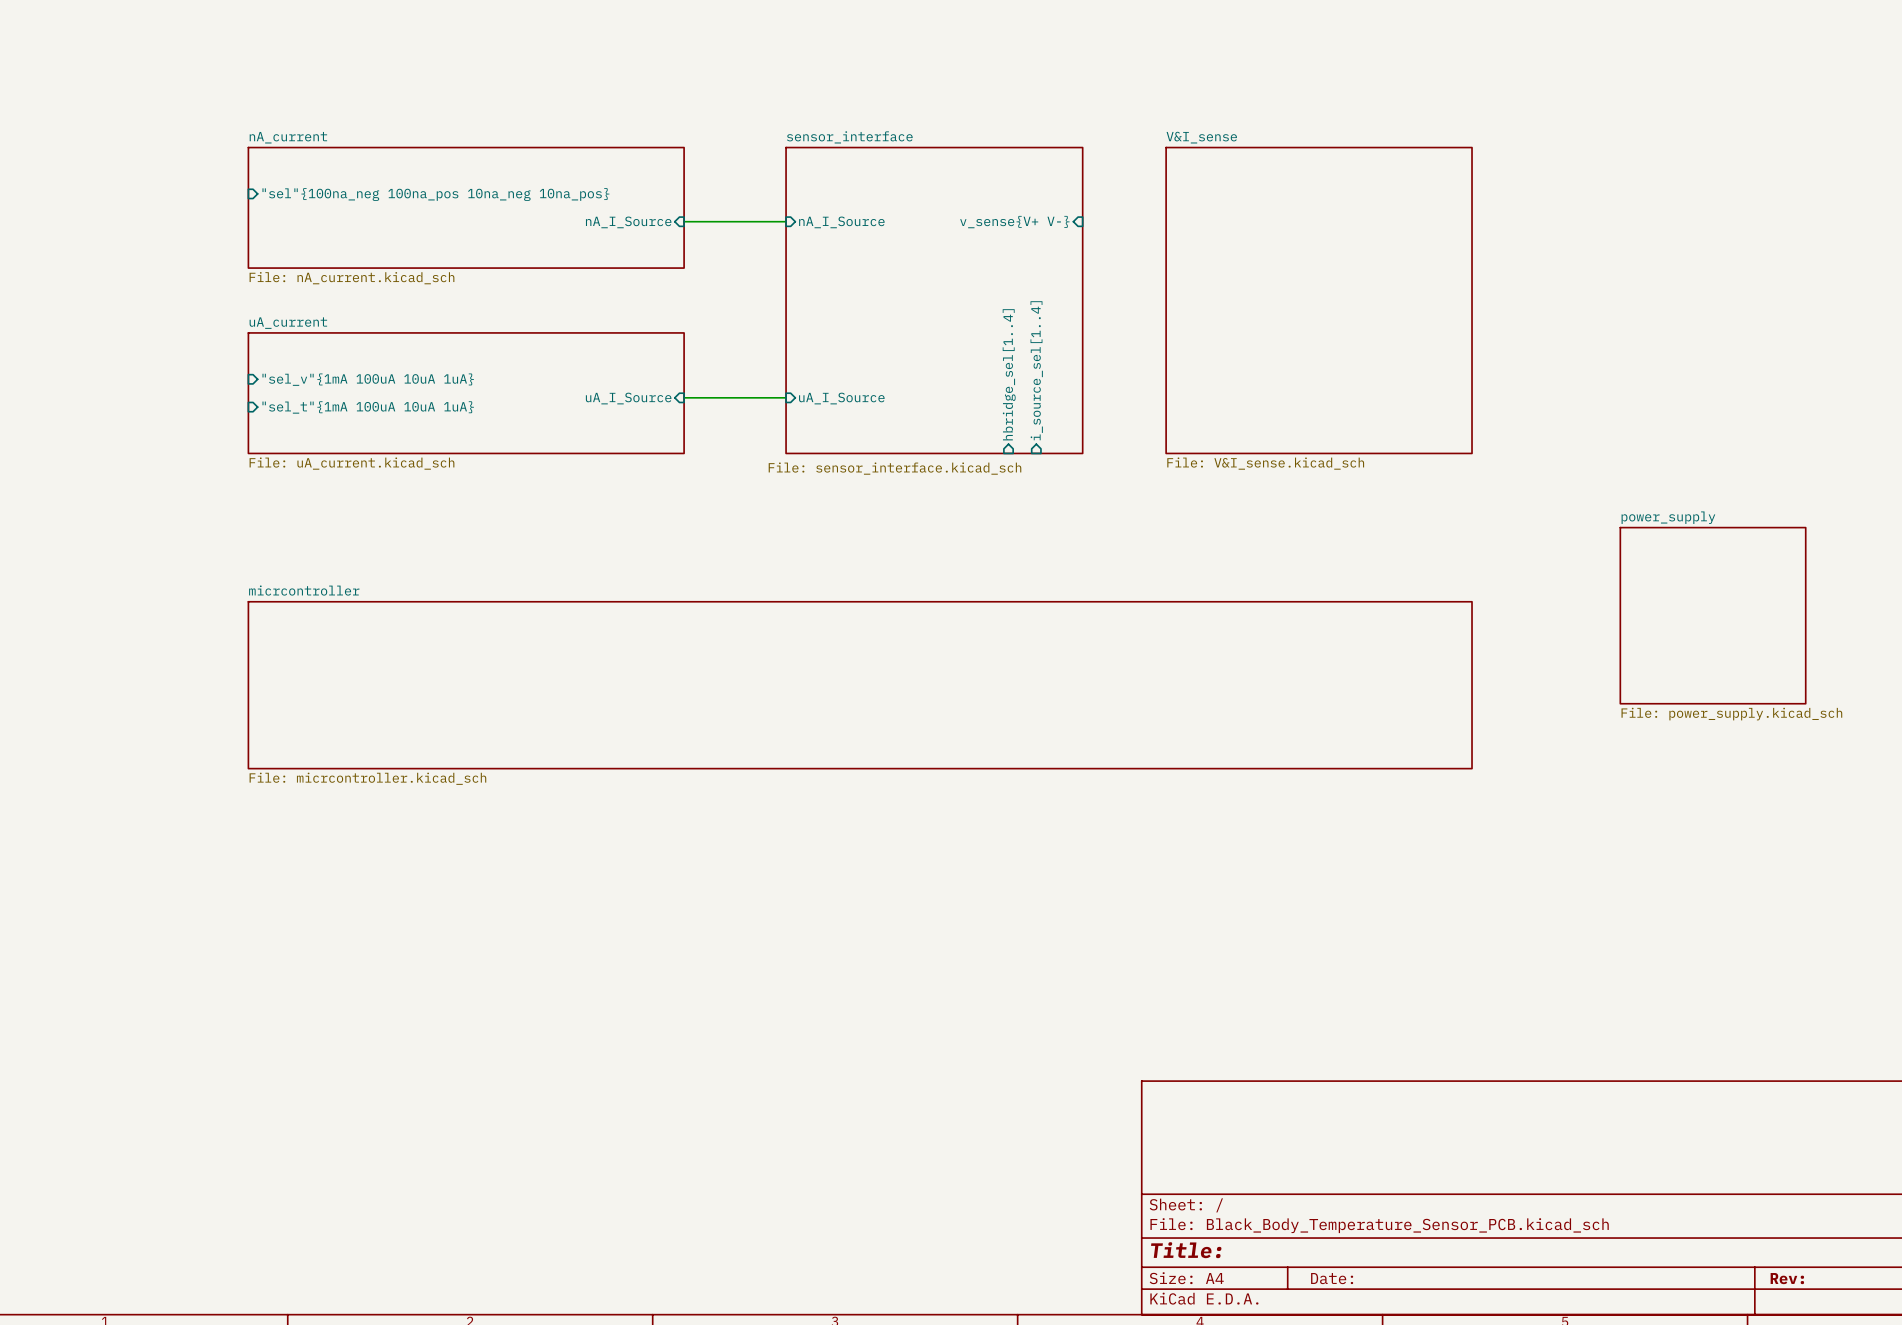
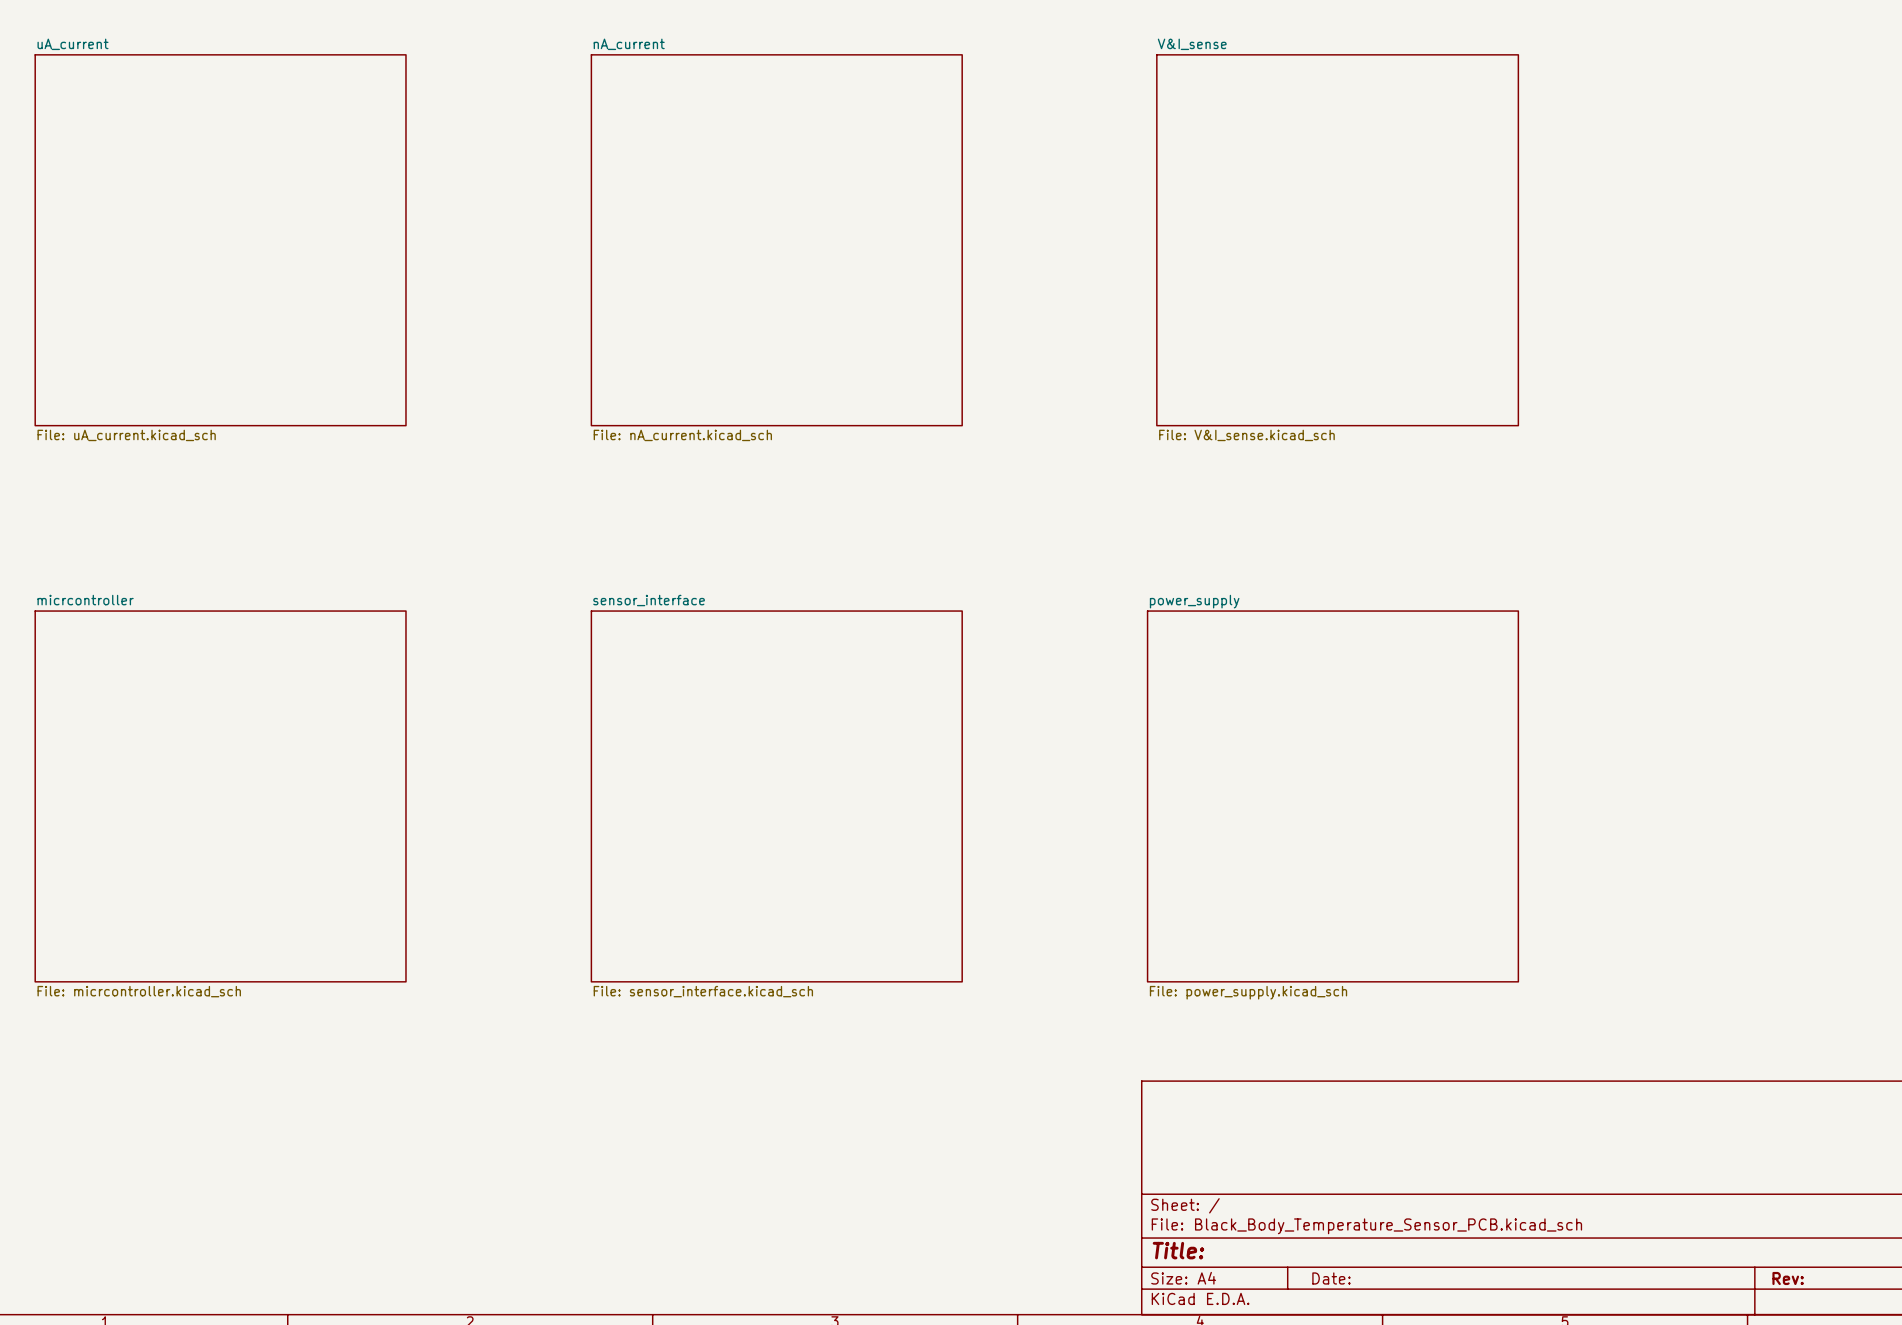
sheet pin: "sel"{100na_neg 100na_pos 10na_neg 10na_pos} (435, 194) -> none
sheet nA_current: File: nA_current.kicad_sch (466, 207) -> none
wire: (684, 221) (786, 221) -> none
sheet pin: nA_I_Source (628, 222) -> none
sheet pin: nA_I_Source (841, 222) -> none
sheet pin: v_sense{V+ V-} (1014, 222) -> none
sheet uA_current: none -> File: uA_current.kicad_sch (220, 240)
sheet nA_current: none -> File: nA_current.kicad_sch (776, 240)
sheet V&I_sense: none -> File: V&I_sense.kicad_sch (1337, 240)
sheet sensor_interface: File: sensor_interface.kicad_sch (934, 300) -> none
sheet V&I_sense: File: V&I_sense.kicad_sch (1319, 300) -> none
sheet pin: i_source_sel[1..4] (1036, 370) -> none
sheet pin: hbridge_sel[1..4] (1009, 374) -> none
sheet pin: "sel_v"{1mA 100uA 10uA 1uA} (368, 379) -> none
sheet uA_current: File: uA_current.kicad_sch (466, 393) -> none
wire: (684, 397) (786, 397) -> none
sheet pin: uA_I_Source (628, 398) -> none
sheet pin: uA_I_Source (841, 398) -> none
sheet pin: "sel_t"{1mA 100uA 10uA 1uA} (368, 407) -> none
sheet power_supply: File: power_supply.kicad_sch (1713, 615) -> none
sheet micrcontroller: File: micrcontroller.kicad_sch (860, 685) -> none
sheet micrcontroller: none -> File: micrcontroller.kicad_sch (220, 796)
sheet sensor_interface: none -> File: sensor_interface.kicad_sch (776, 796)
sheet power_supply: none -> File: power_supply.kicad_sch (1332, 796)

